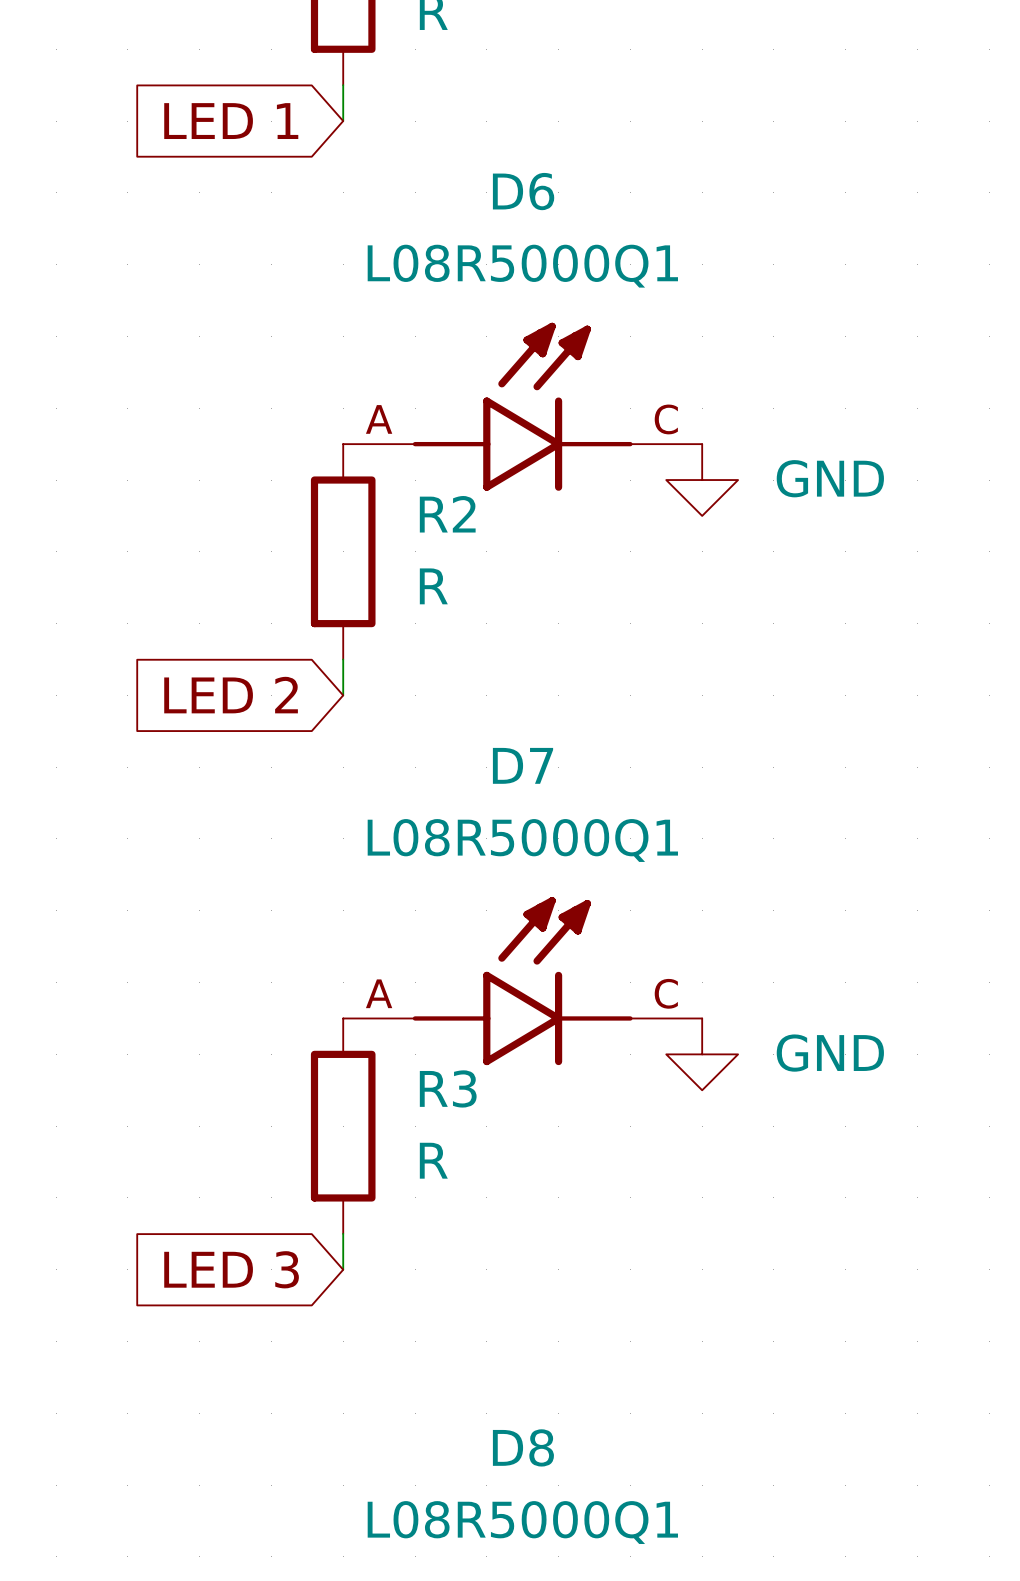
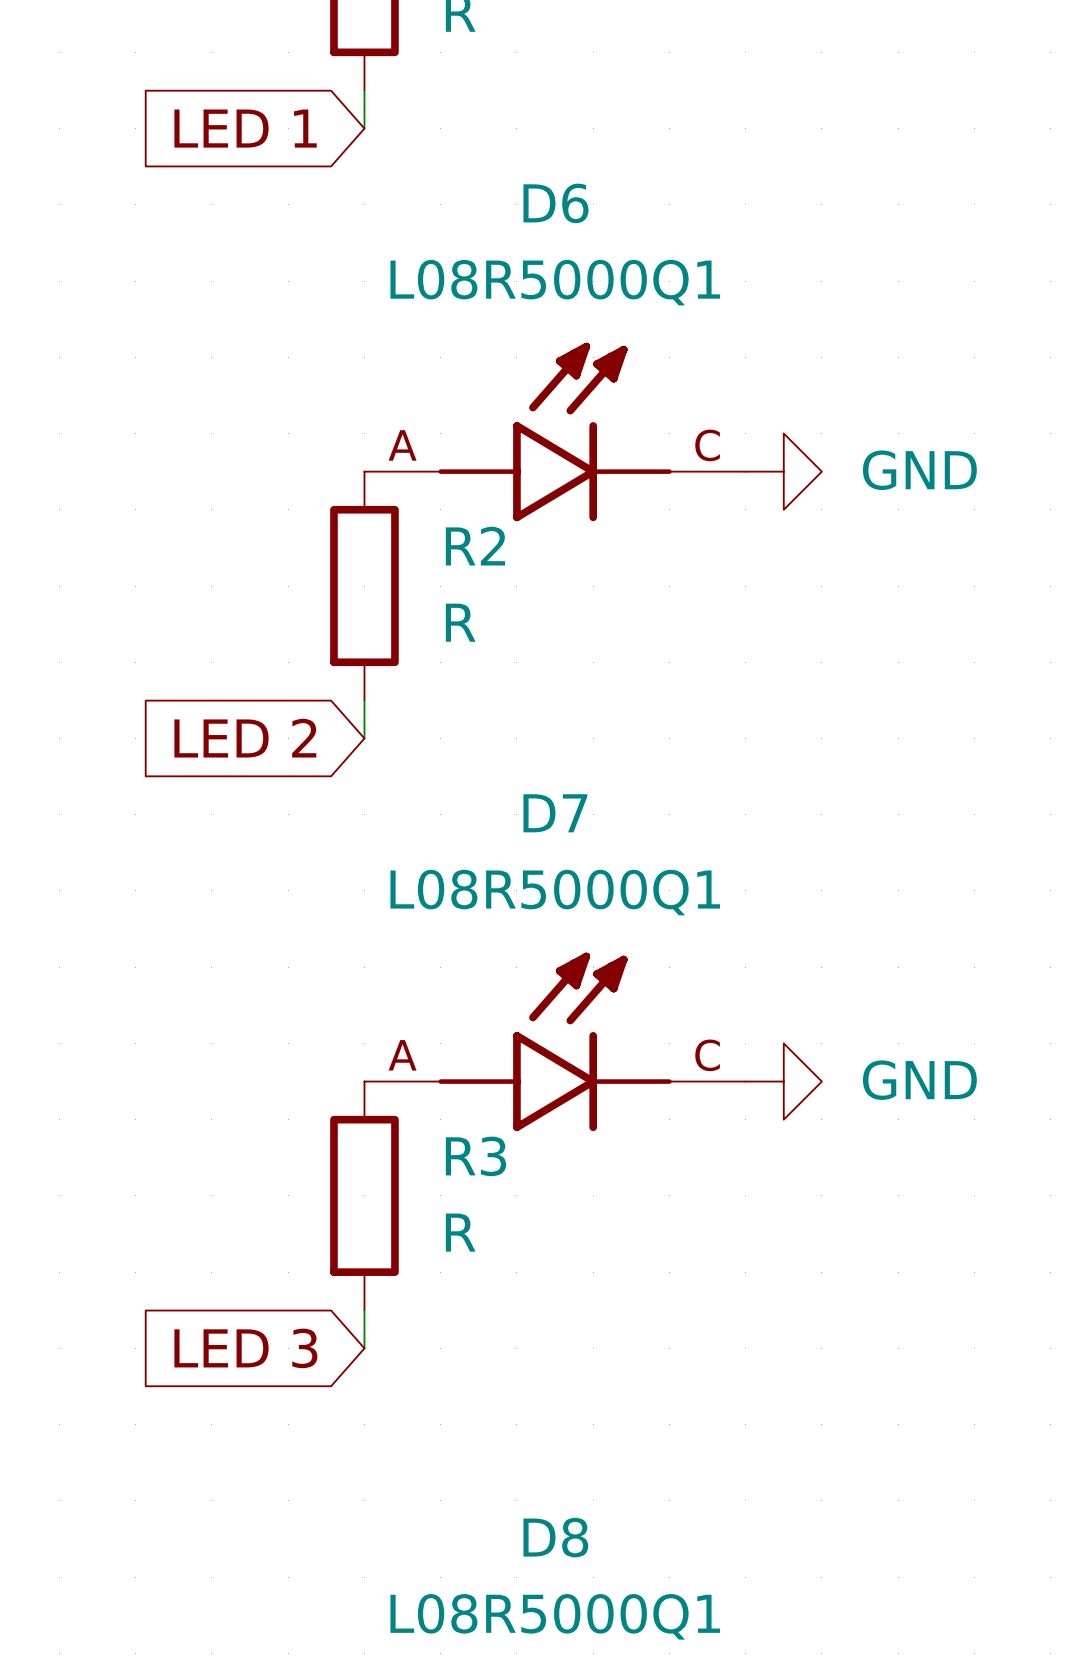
power symbol rotation: 0° (702, 480) -> 90° counterclockwise (783, 471)
power symbol position: GND (702, 480) -> GND (783, 471)
power symbol rotation: 0° (702, 1054) -> 90° counterclockwise (783, 1081)
power symbol position: GND (702, 1054) -> GND (783, 1081)

